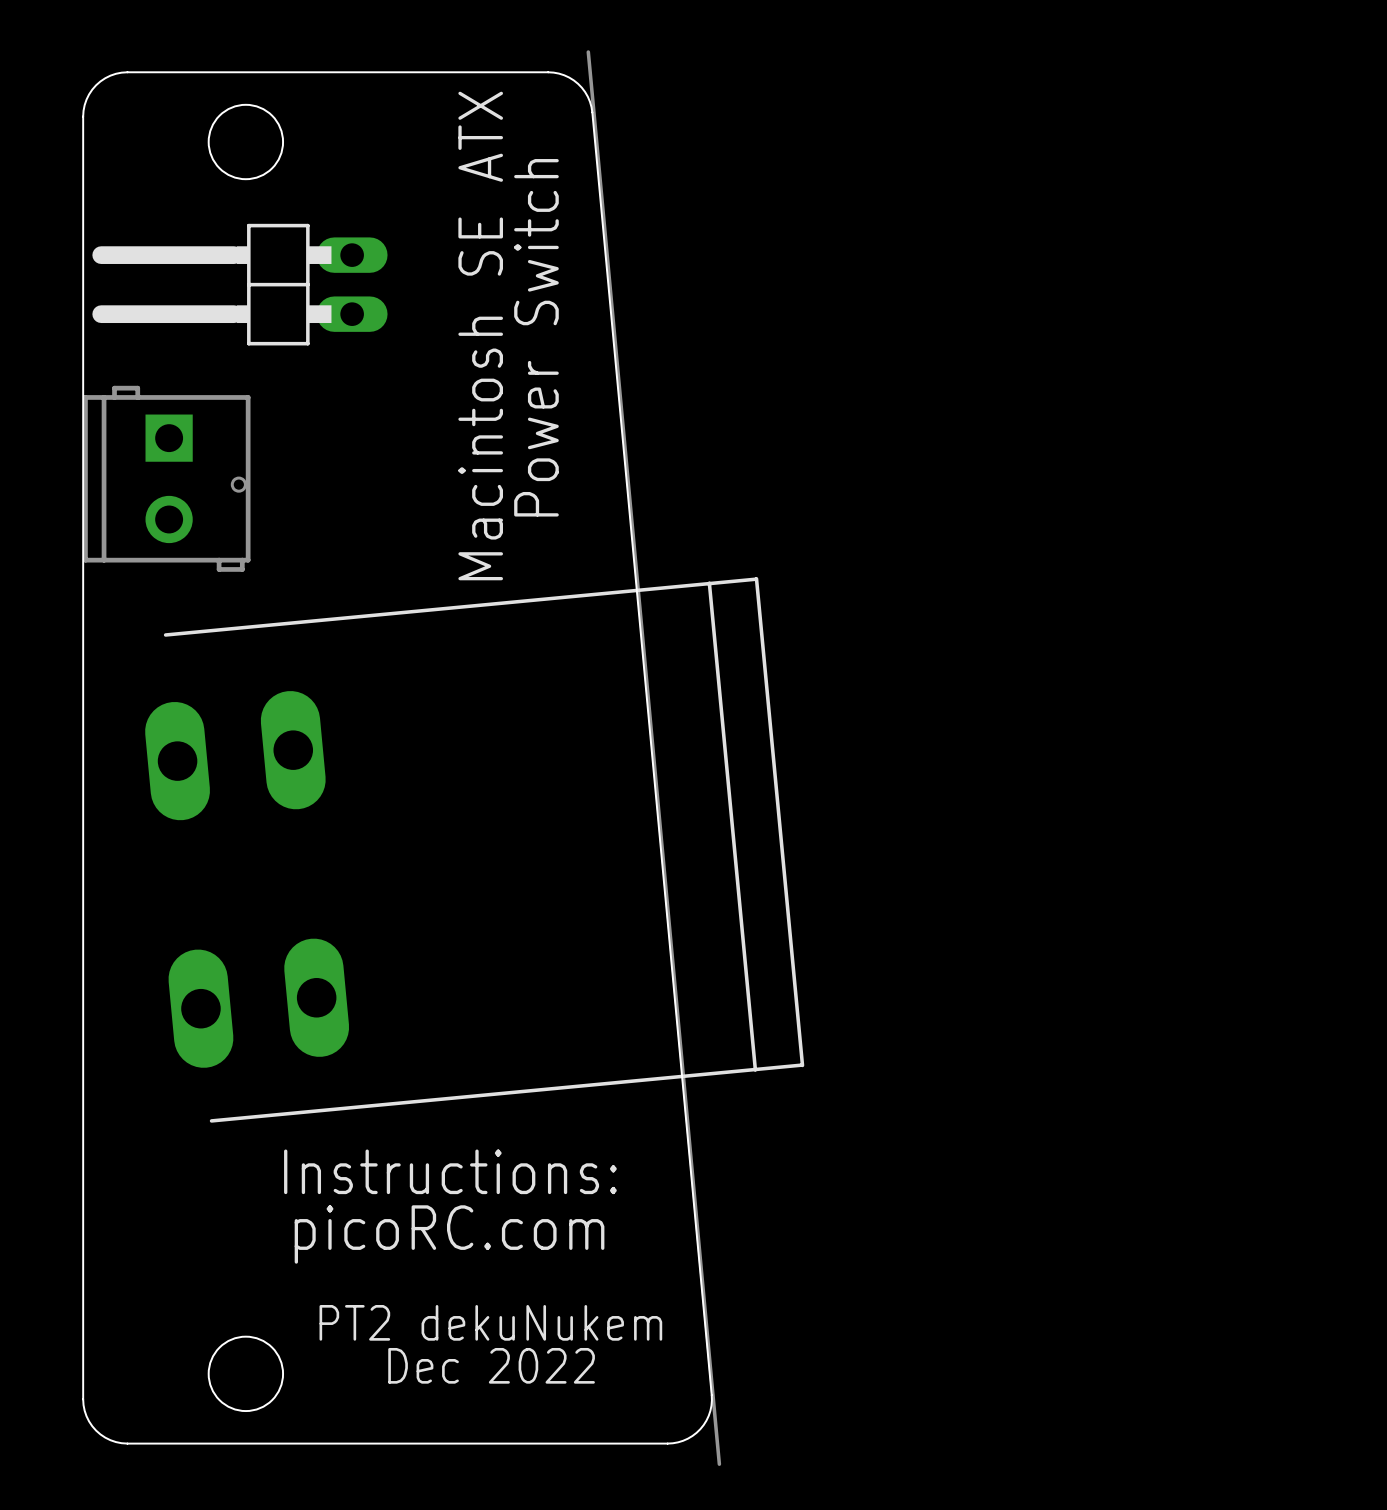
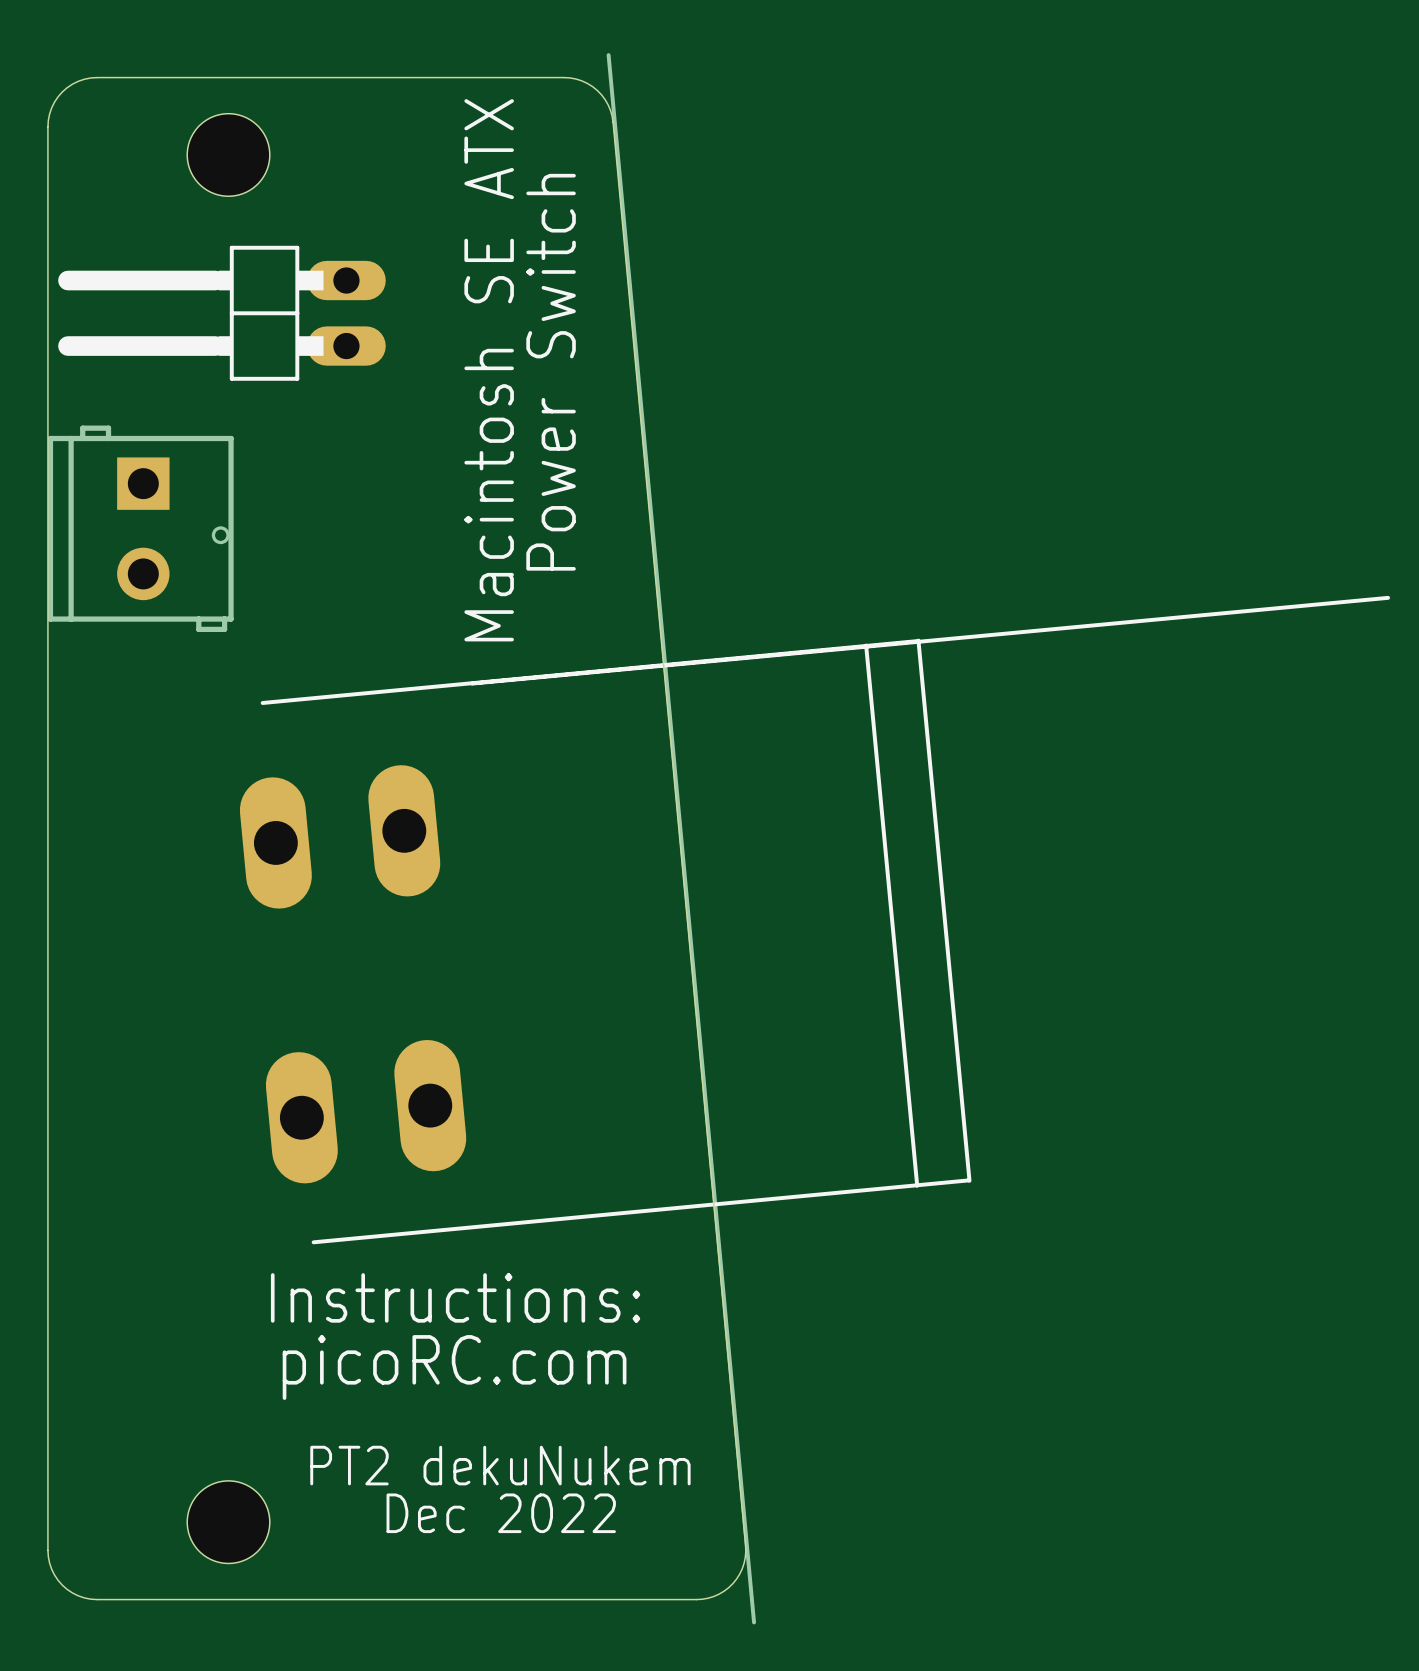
line: none -> (1388, 597) (472, 683)
part position: (474, 849) -> (605, 941)

